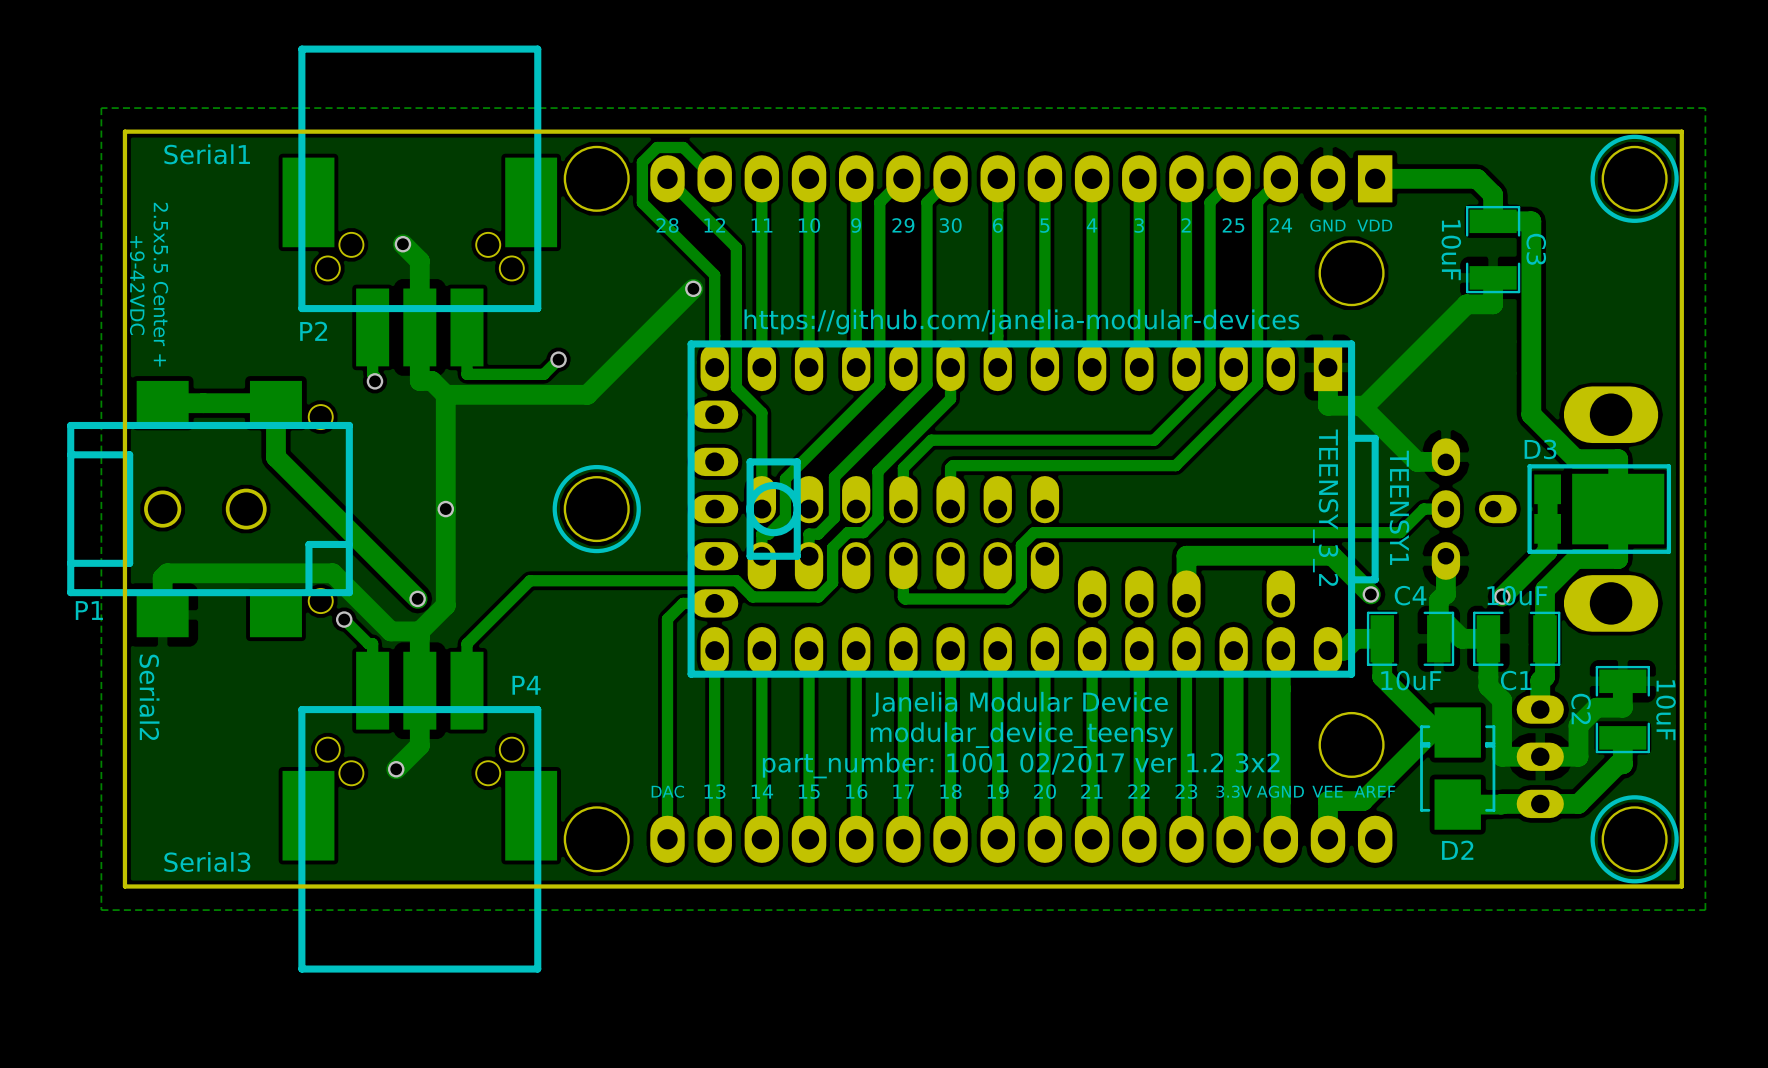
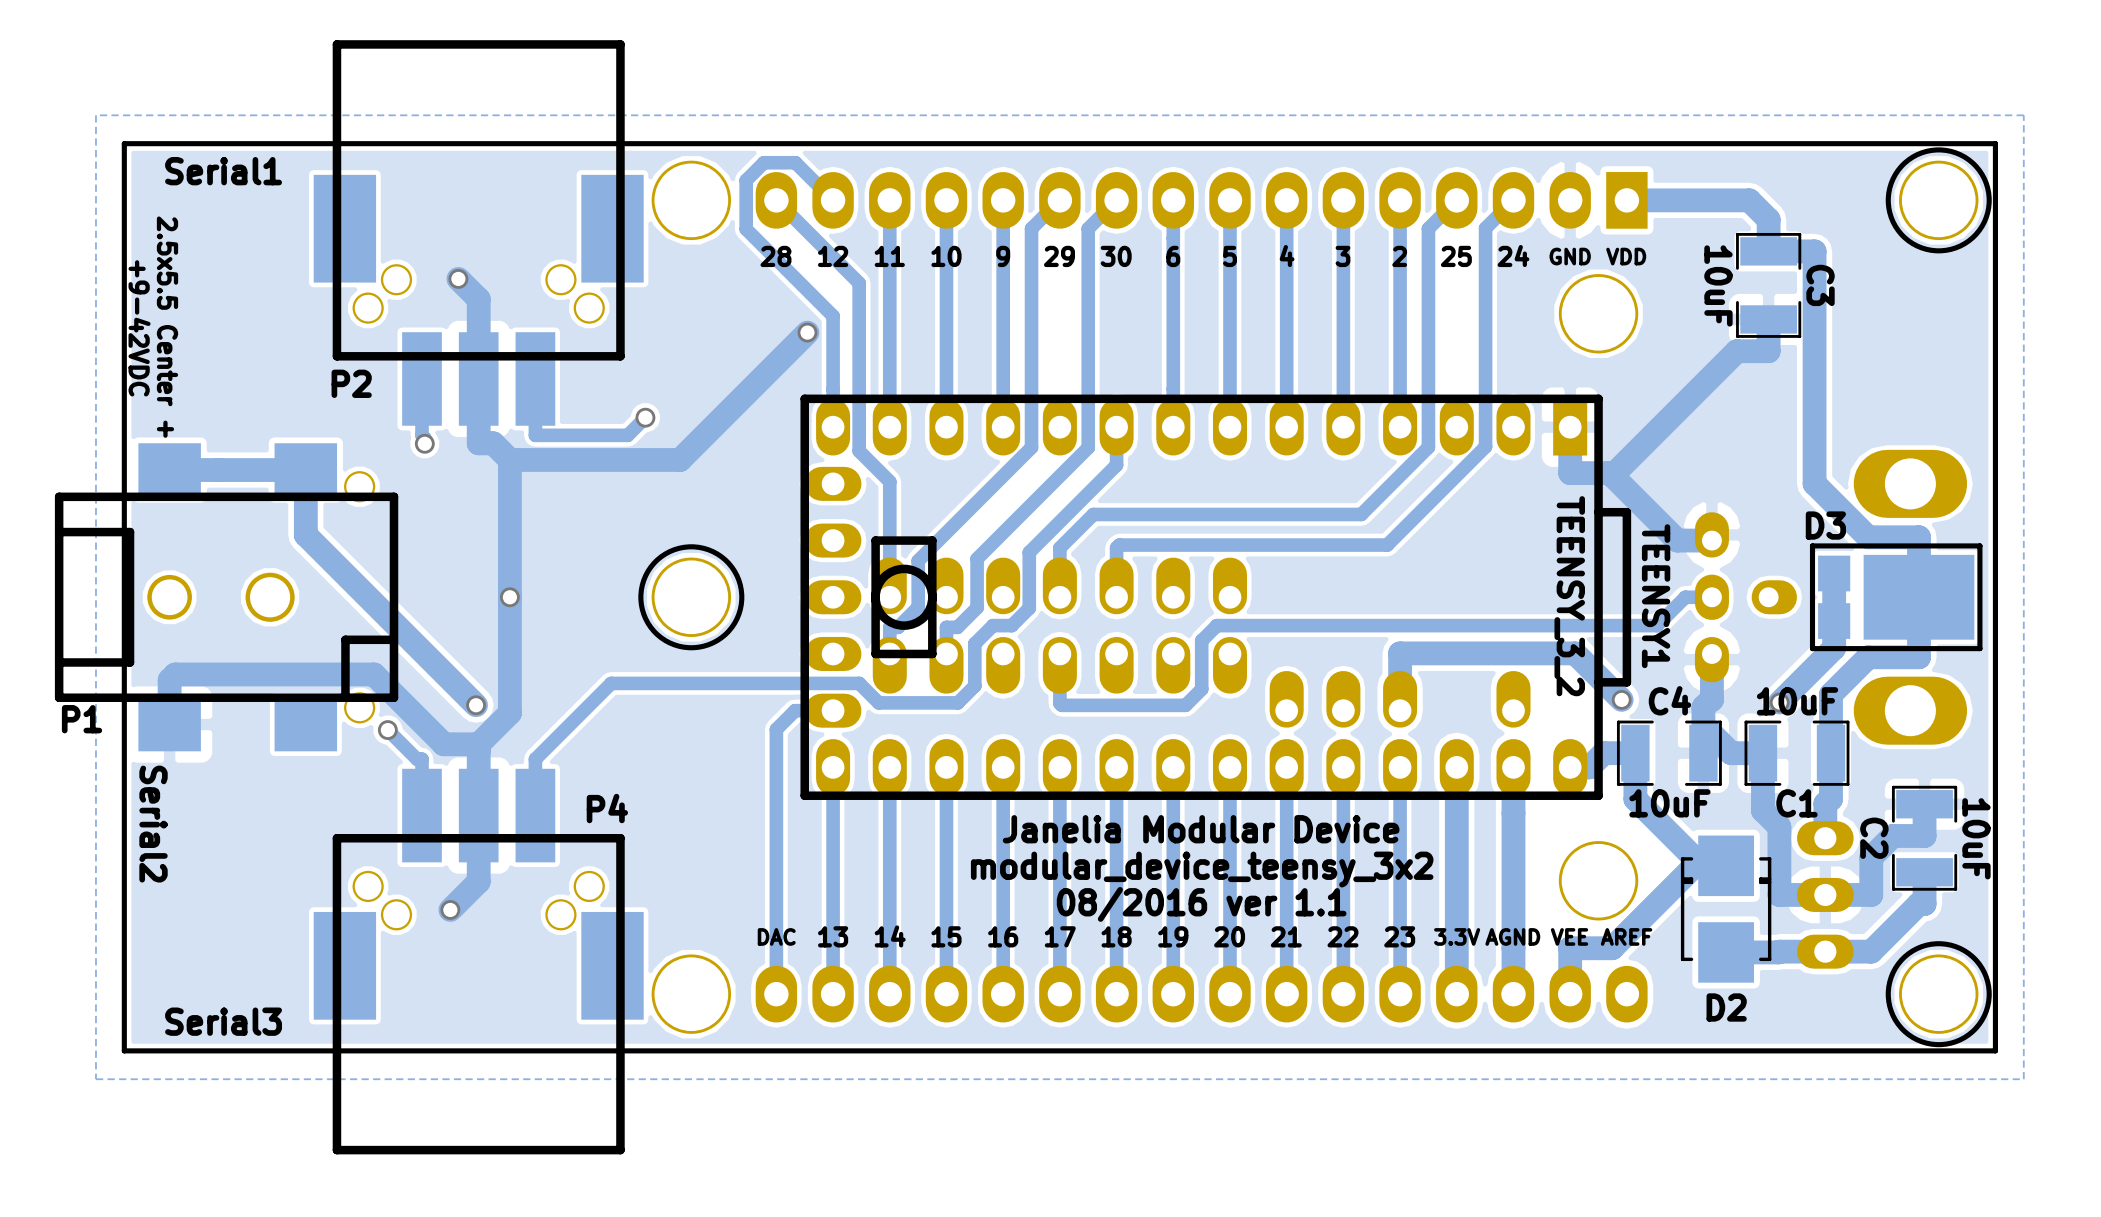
text: https://github.com/janelia-modular-devices (1021, 321) -> none
text: modular_device_teensy (1022, 735) -> modular_device_teensy_3x2 (1202, 869)
text: part_number: 1001 02/2017 ver 1.2 3x2 (1021, 765) -> 08/2016 ver 1.1 (1201, 904)

